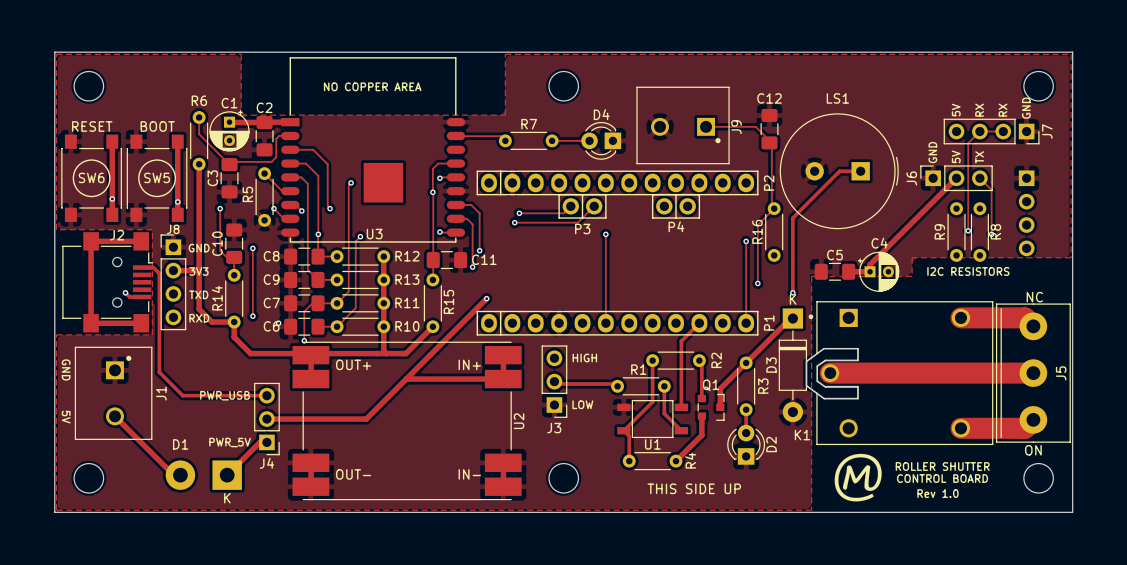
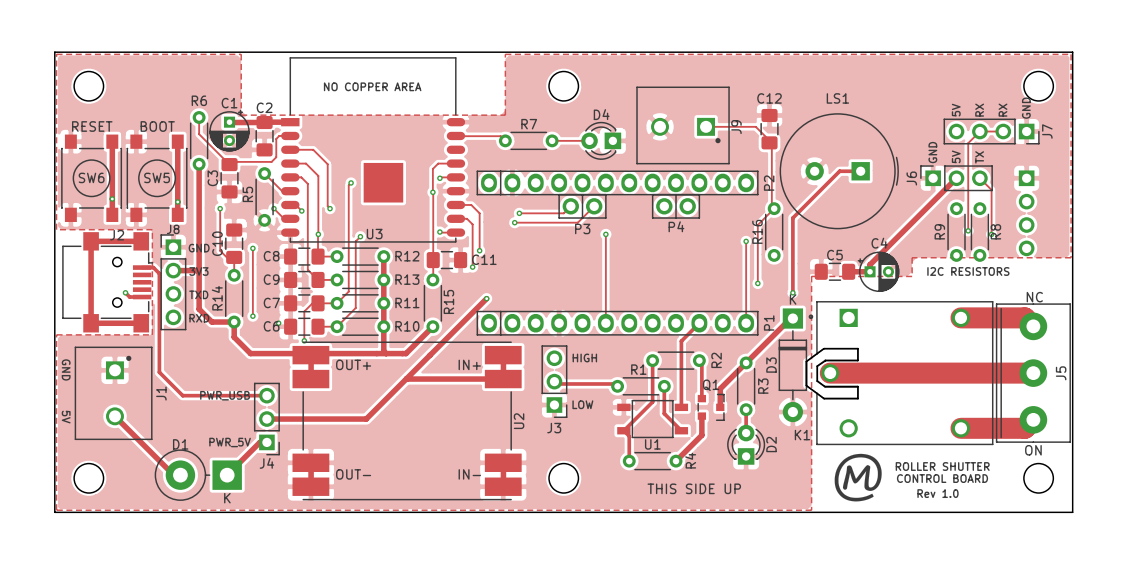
D1 footprint: [165, 460, 242, 490] -> [154, 449, 242, 501]

